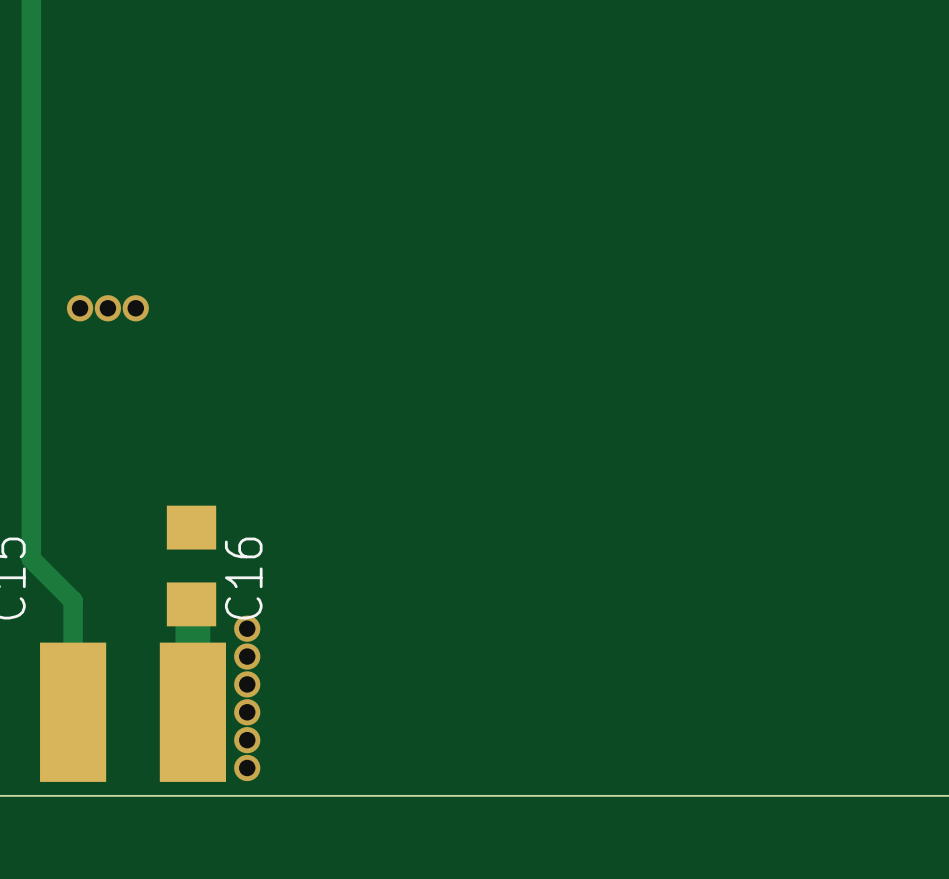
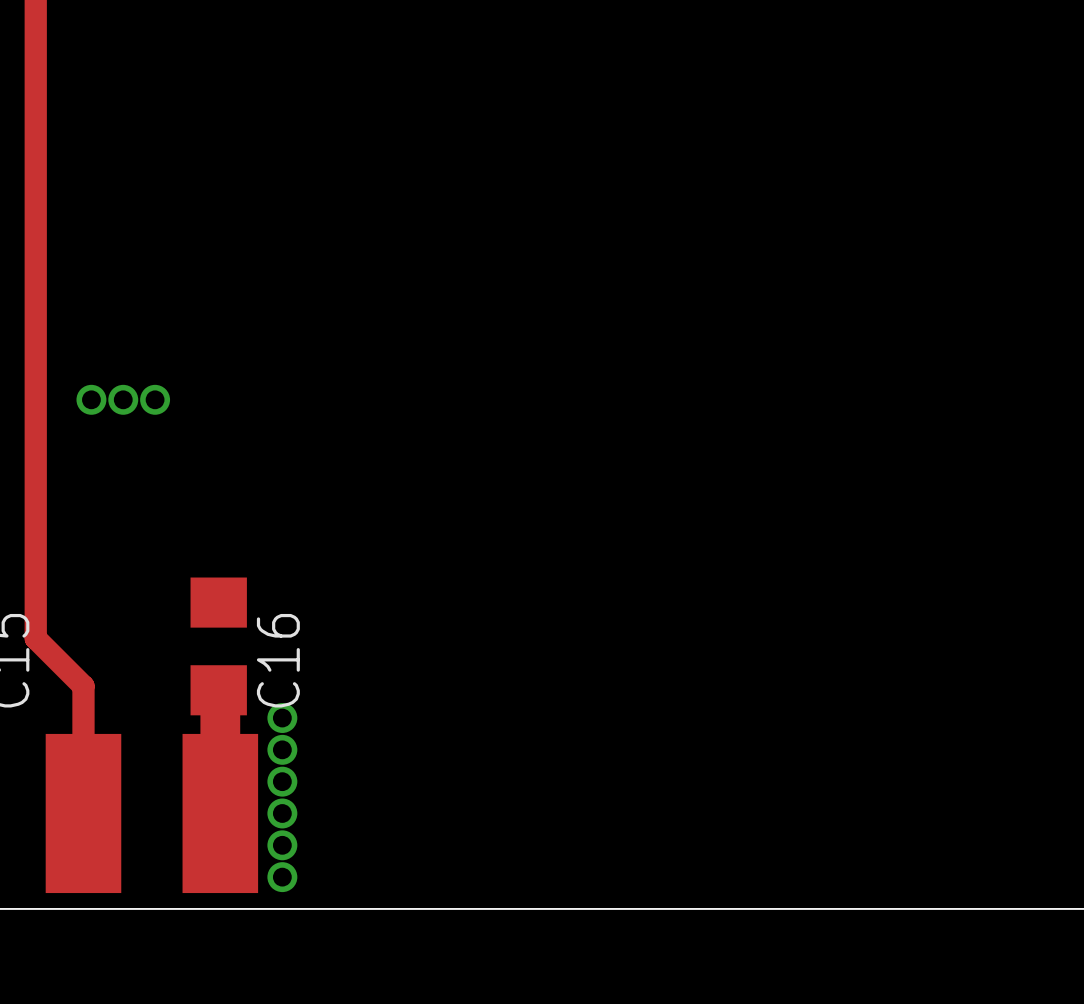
via: (80, 308) -> none
via: (107, 308) -> none
via: (135, 308) -> none
via: none -> (91, 399)
via: none -> (123, 399)
via: none -> (155, 399)

